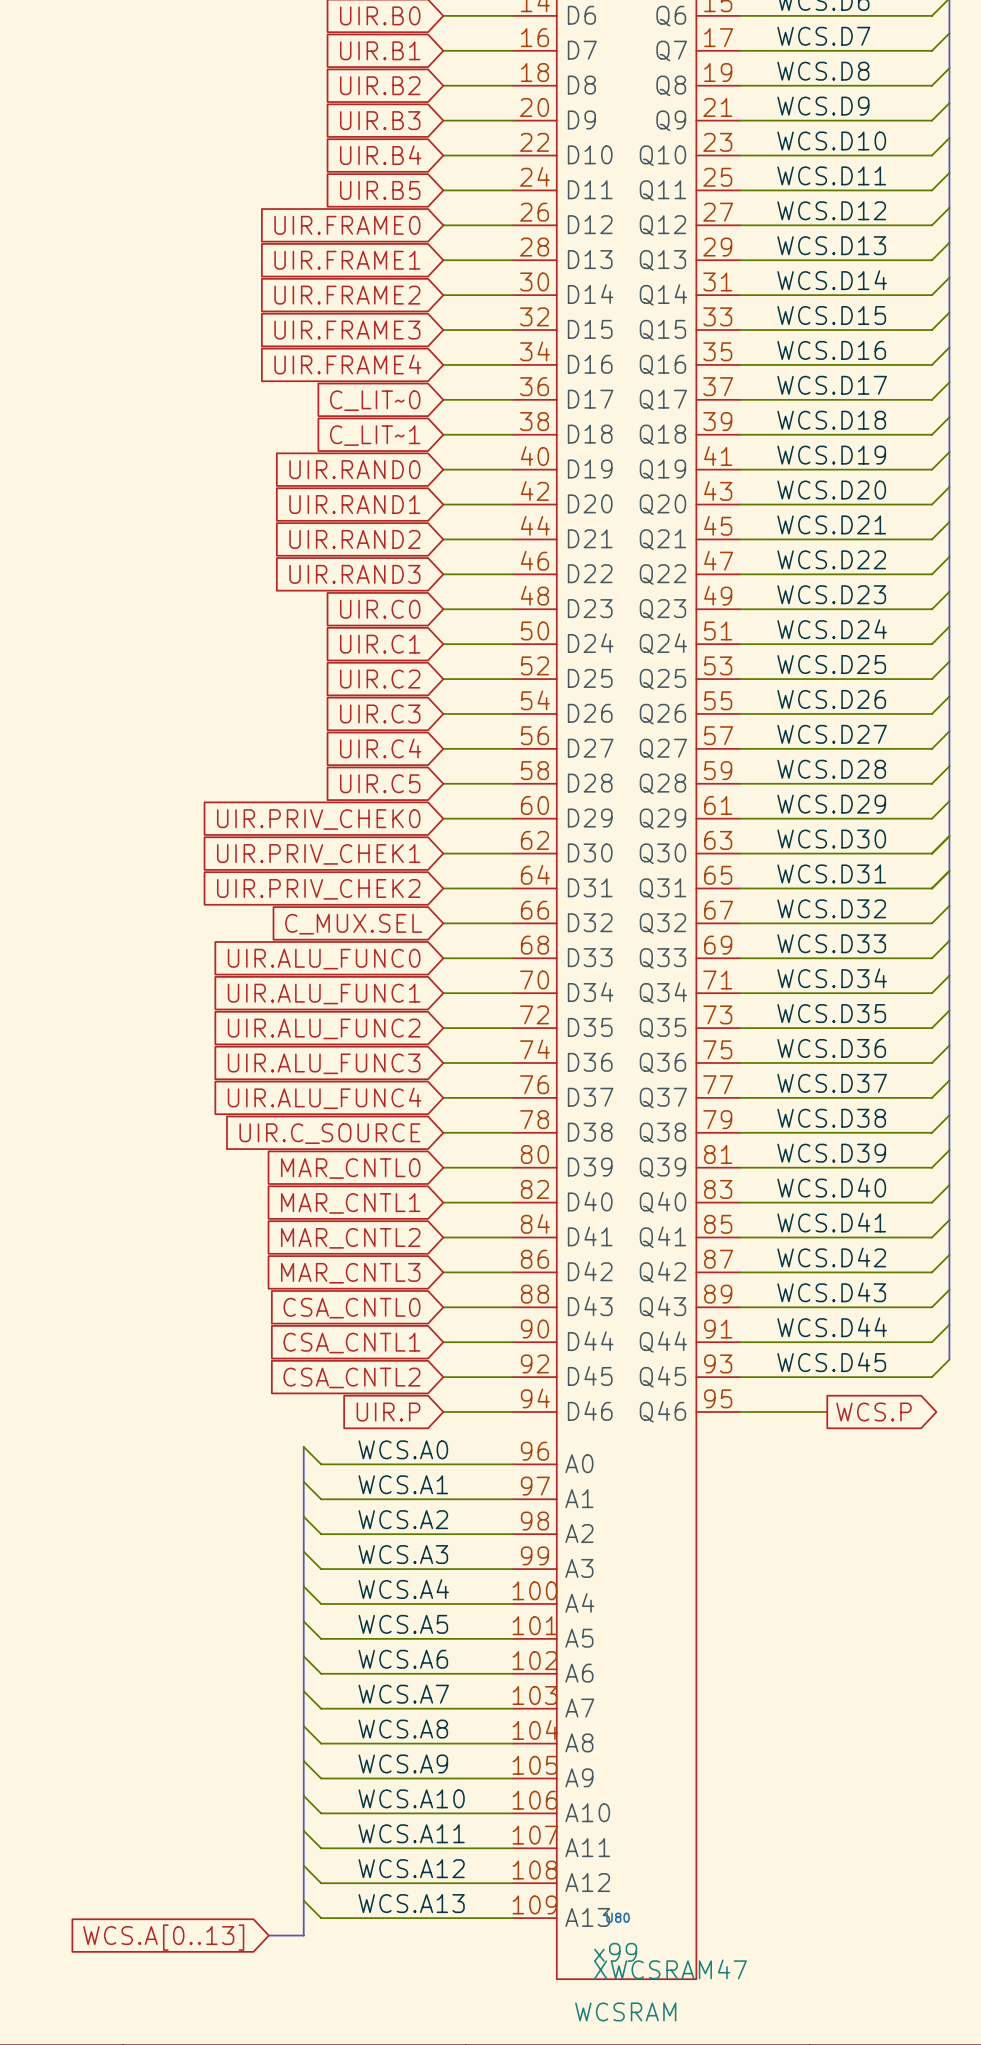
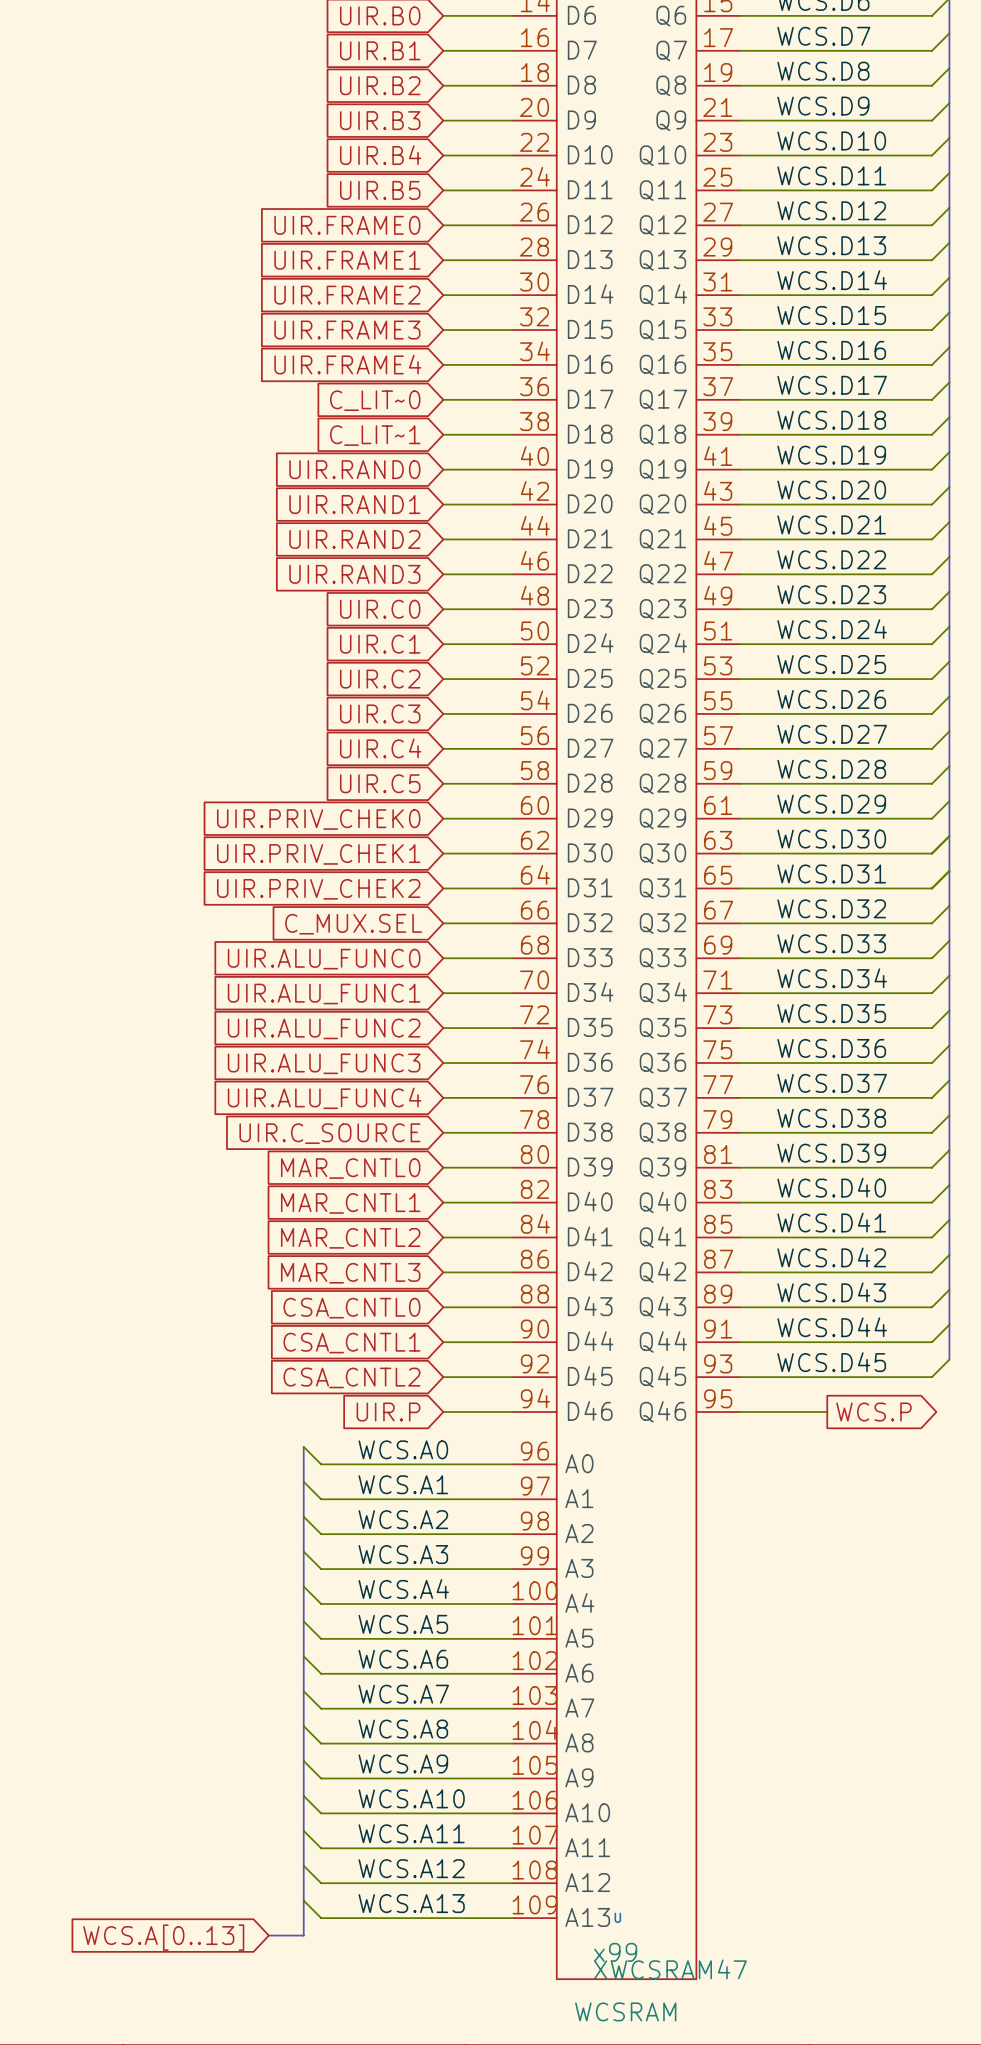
U80 name: U80 (618, 1917) -> U (617, 1917)

